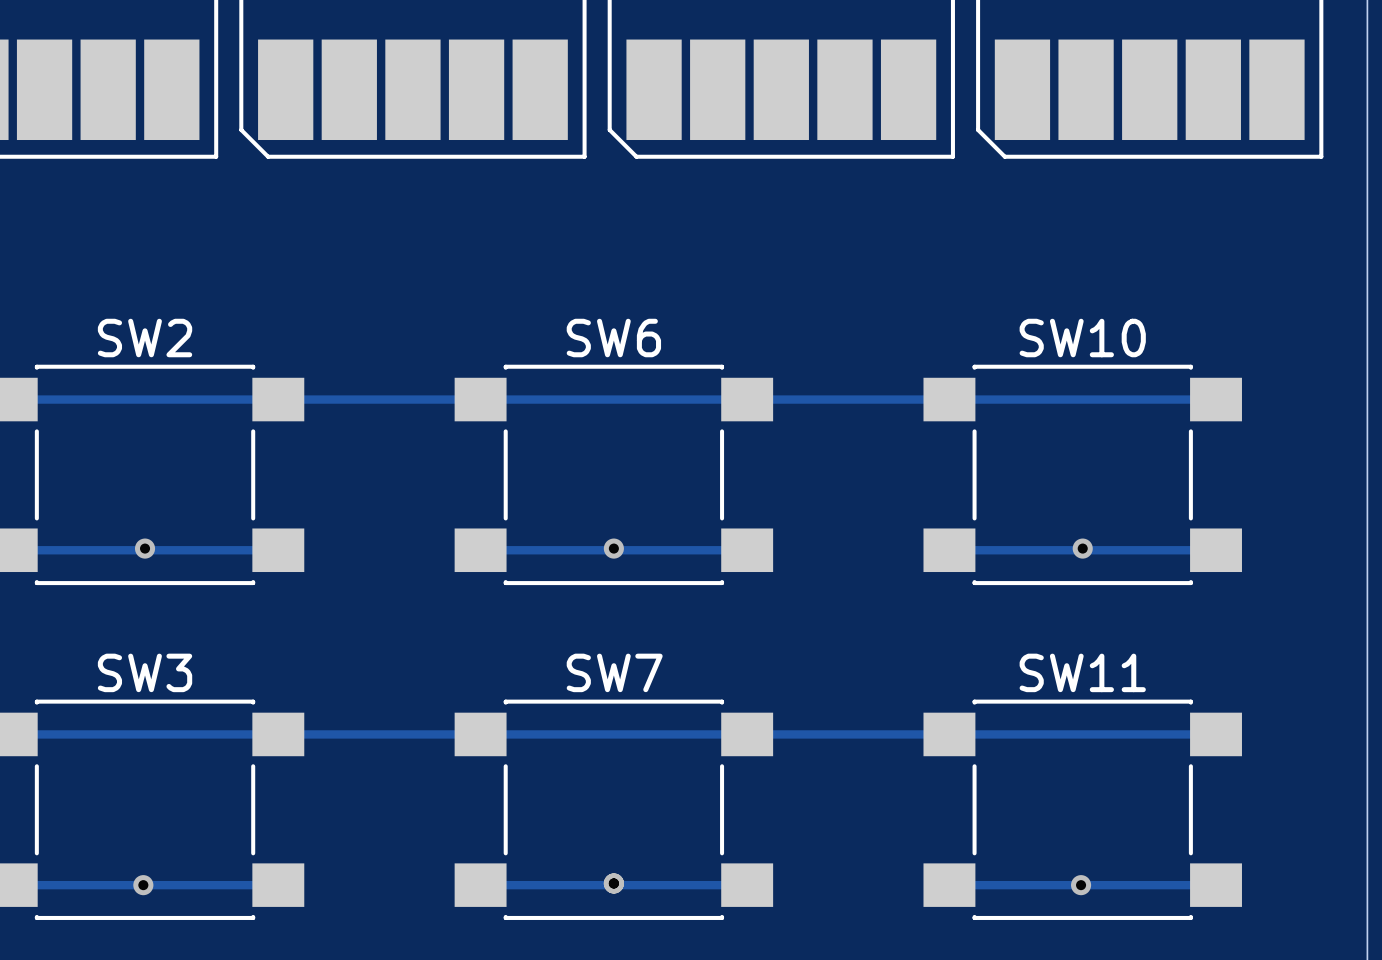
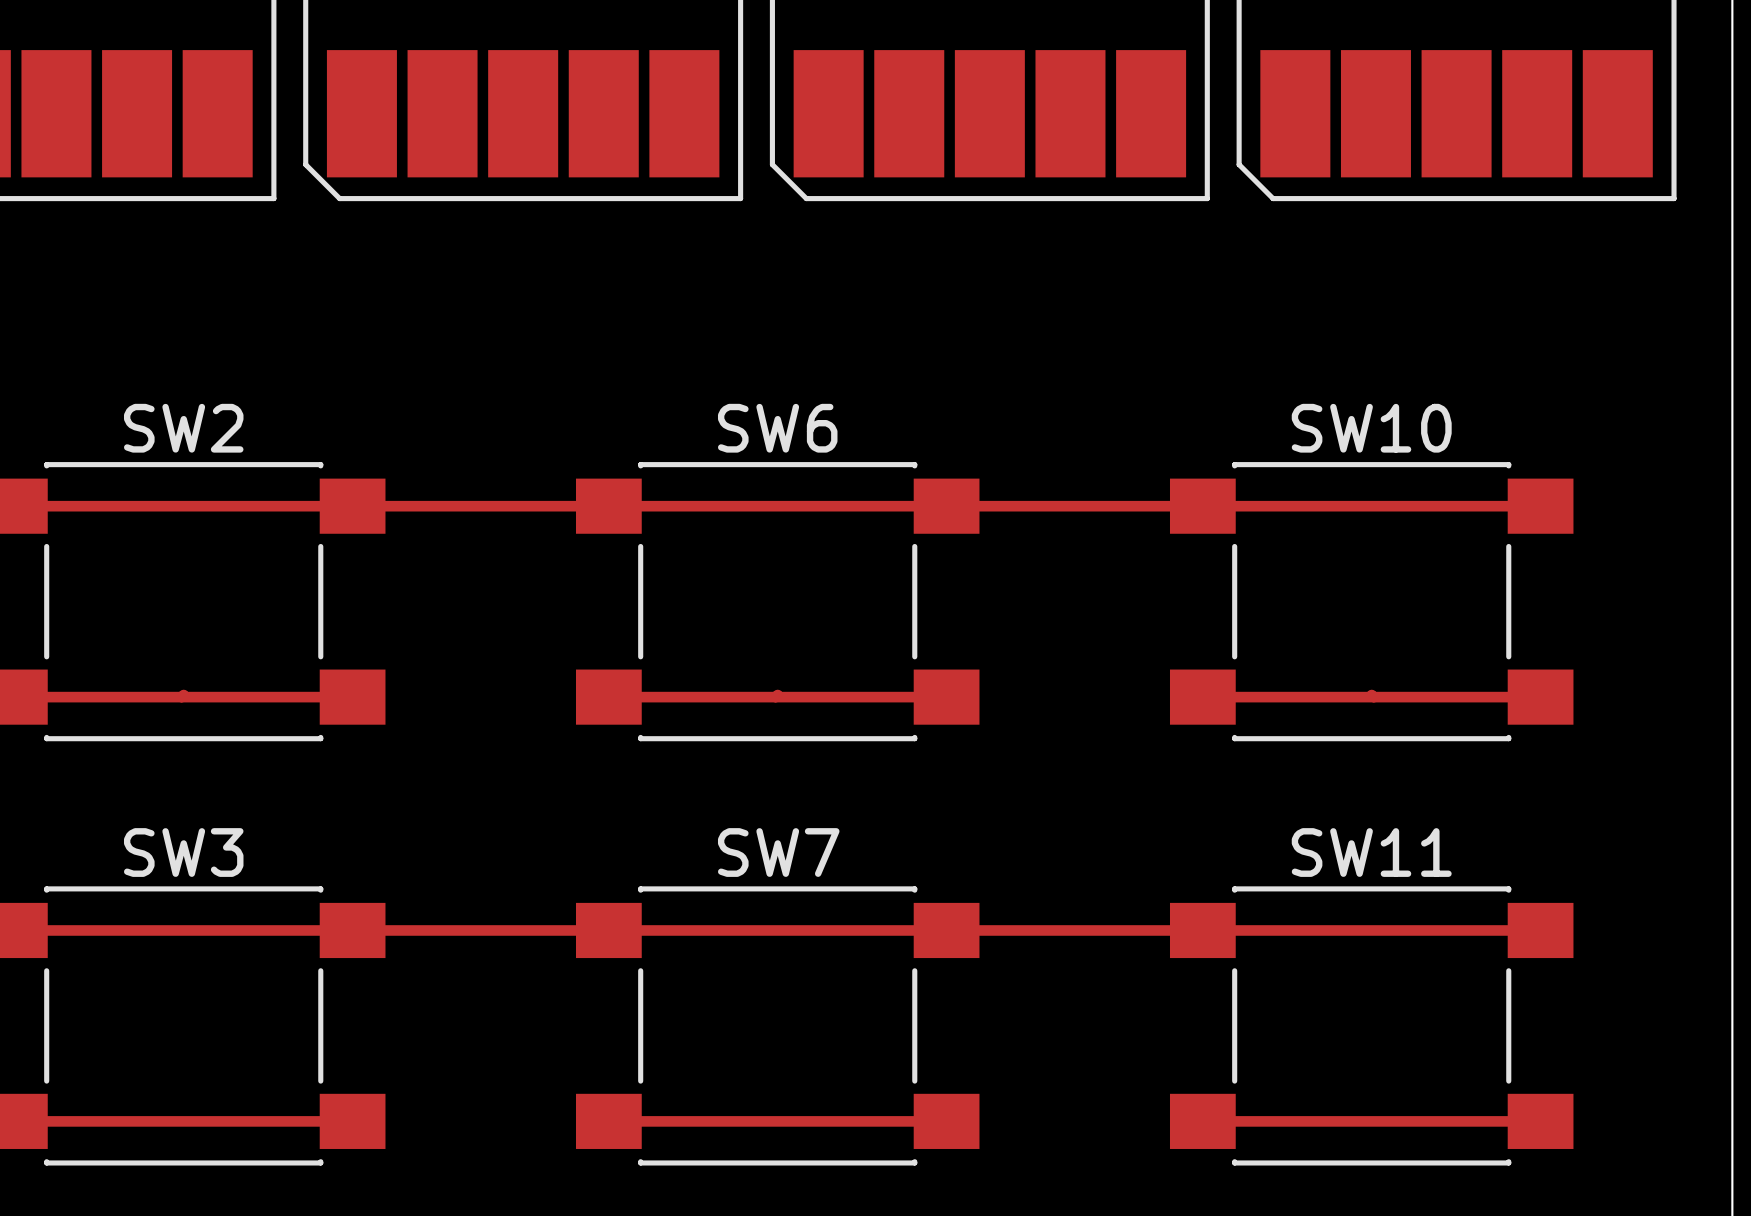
via: (145, 548) -> none
via: (613, 548) -> none
via: (1082, 548) -> none
via: (613, 883) -> none
via: (143, 885) -> none
via: (1081, 885) -> none

